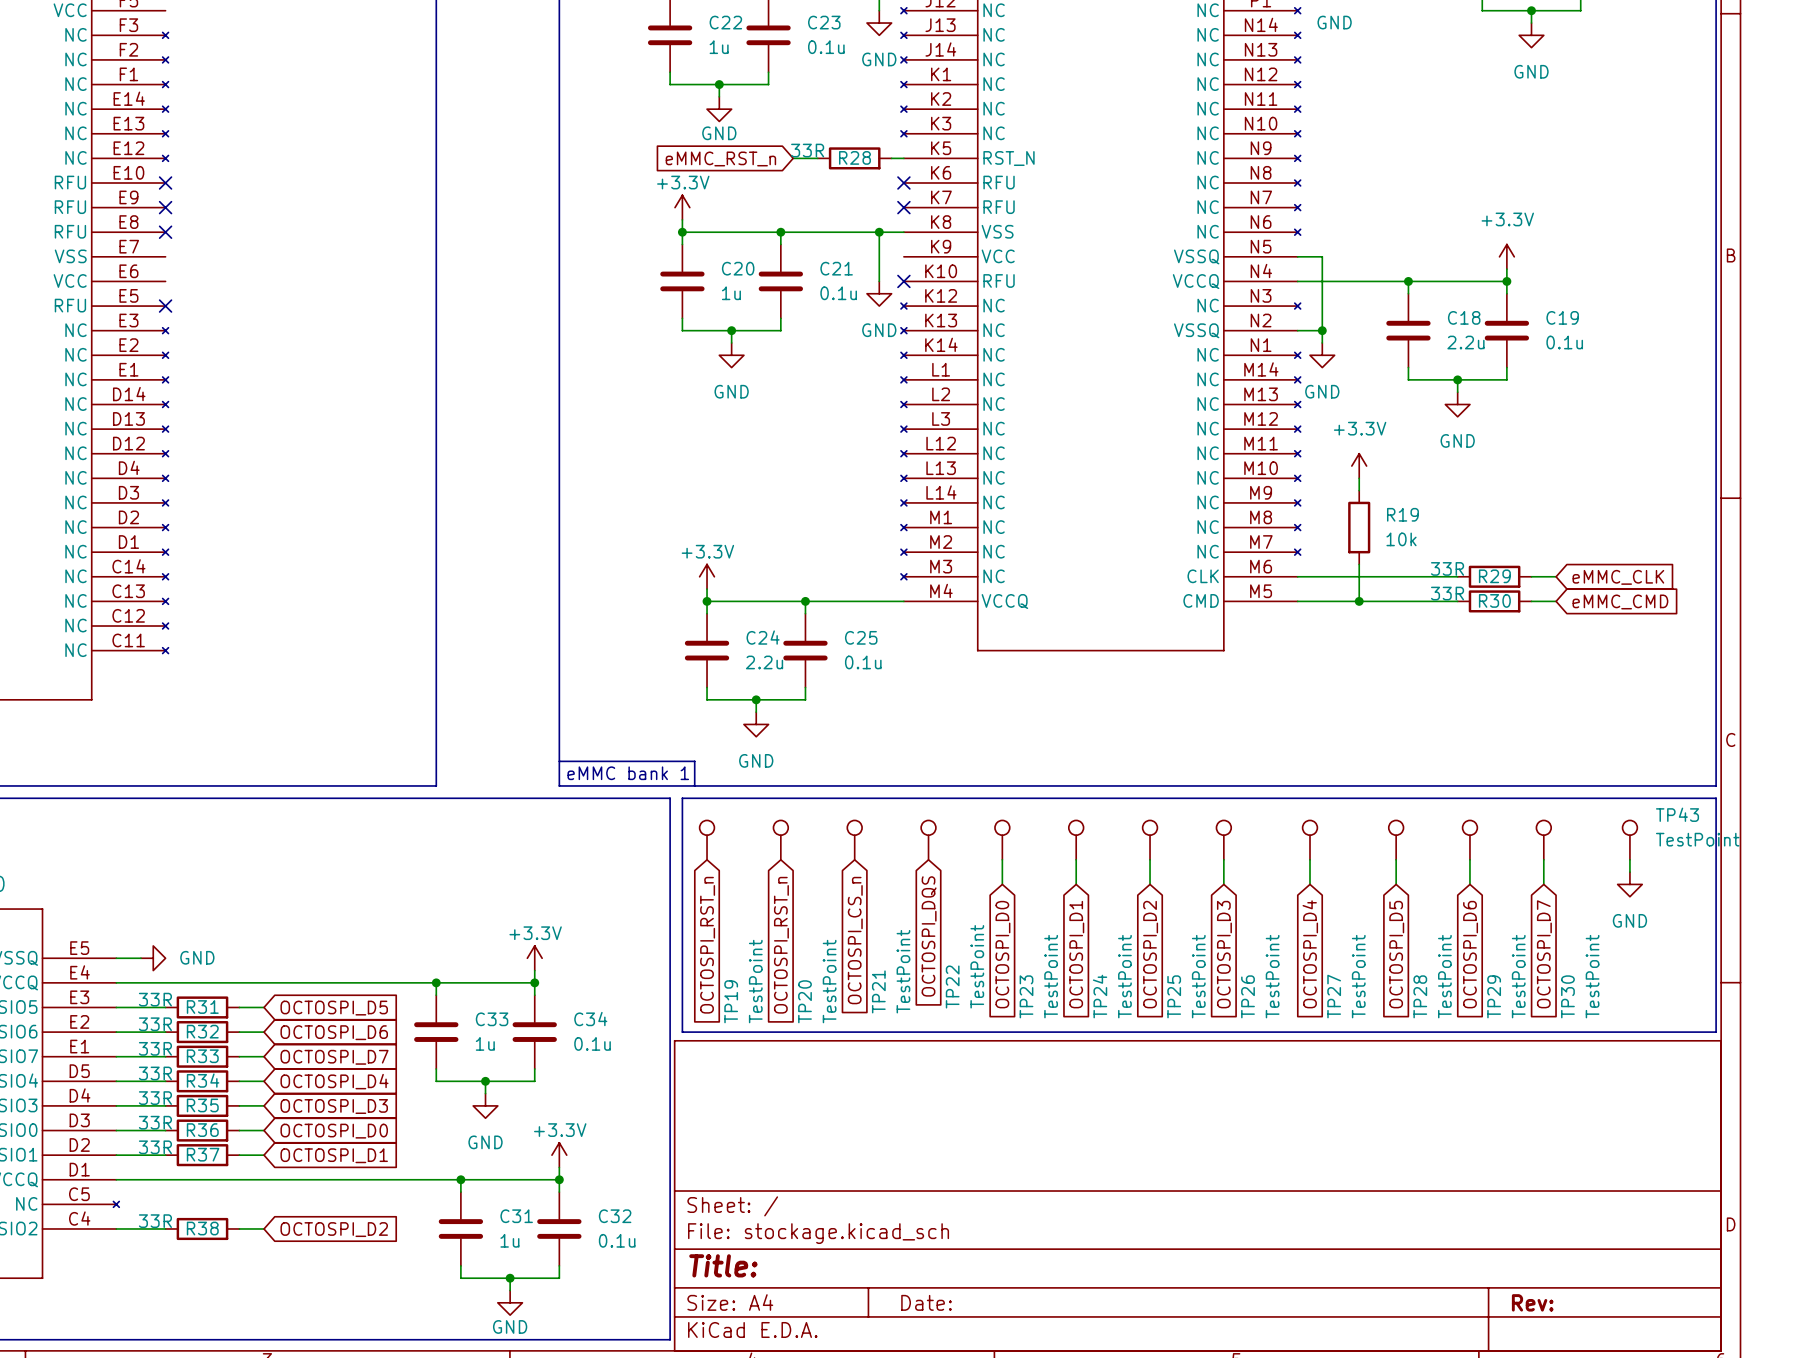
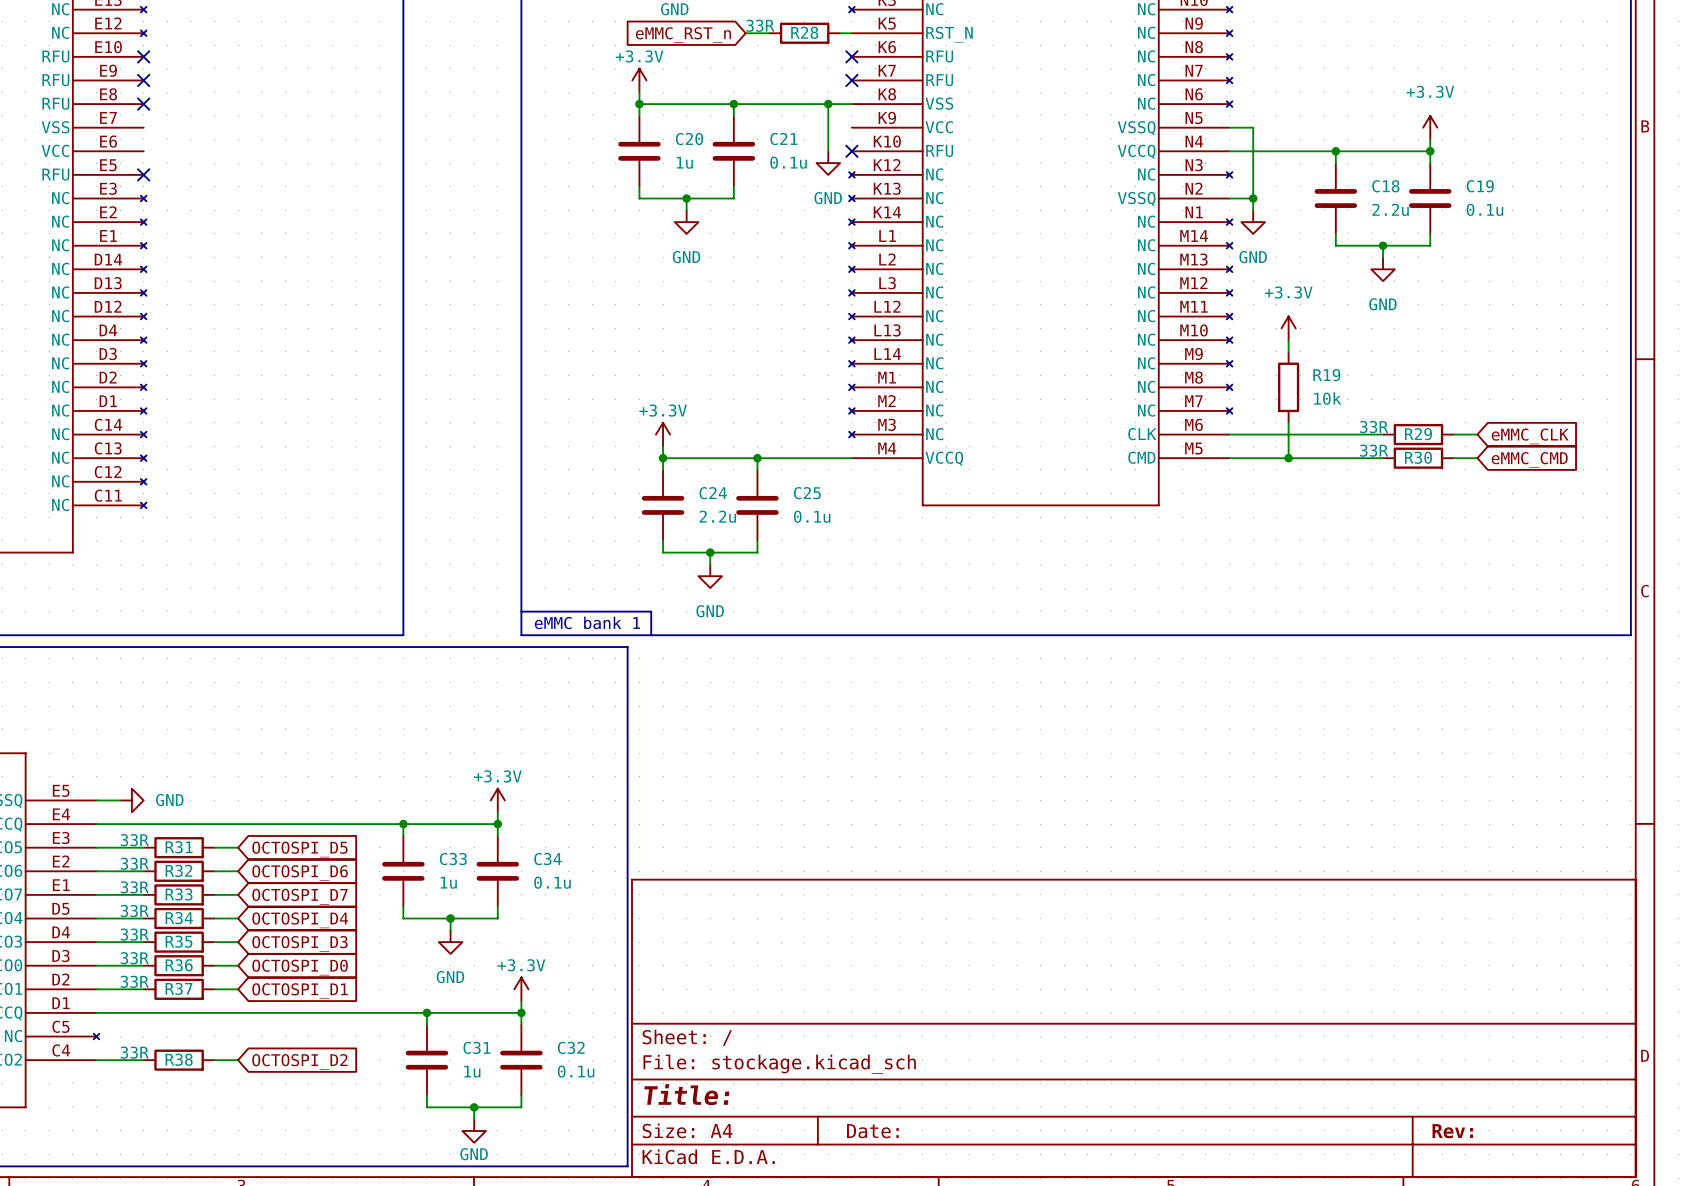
line: (682, 798) (1716, 798) (1716, 1032) (682, 1032) (682, 798) -> none
TP19: TestPoint (707, 840) -> none
TP20: TestPoint (780, 840) -> none
TP21: TestPoint (854, 840) -> none
TP22: TestPoint (928, 840) -> none
TP23: TestPoint (1002, 840) -> none
TP24: TestPoint (1076, 840) -> none
TP25: TestPoint (1150, 840) -> none
TP26: TestPoint (1223, 840) -> none
TP27: TestPoint (1310, 840) -> none
TP28: TestPoint (1396, 840) -> none
TP29: TestPoint (1469, 840) -> none
TP30: TestPoint (1543, 840) -> none
TP43: TestPoint (1629, 840) -> none
wire: (1002, 859) (1002, 884) -> none
wire: (1076, 859) (1076, 884) -> none
wire: (1150, 859) (1150, 884) -> none
wire: (1223, 859) (1223, 884) -> none
wire: (1310, 859) (1310, 884) -> none
wire: (1396, 859) (1396, 884) -> none
wire: (1469, 859) (1469, 884) -> none
wire: (1543, 859) (1543, 884) -> none
wire: (1629, 859) (1629, 872) -> none
power symbol: GND (1629, 884) -> none
global label: OCTOSPI_DQS (929, 936) -> none
global label: OCTOSPI_CS_n (855, 940) -> none
global label: OCTOSPI_RST_n (707, 945) -> none
global label: OCTOSPI_RST_n (781, 945) -> none
global label: OCTOSPI_D0 (1002, 954) -> none
global label: OCTOSPI_D1 (1076, 954) -> none
global label: OCTOSPI_D2 (1150, 954) -> none
global label: OCTOSPI_D3 (1224, 954) -> none
global label: OCTOSPI_D4 (1310, 954) -> none
global label: OCTOSPI_D5 (1396, 954) -> none
global label: OCTOSPI_D6 (1470, 954) -> none
global label: OCTOSPI_D7 (1544, 954) -> none

